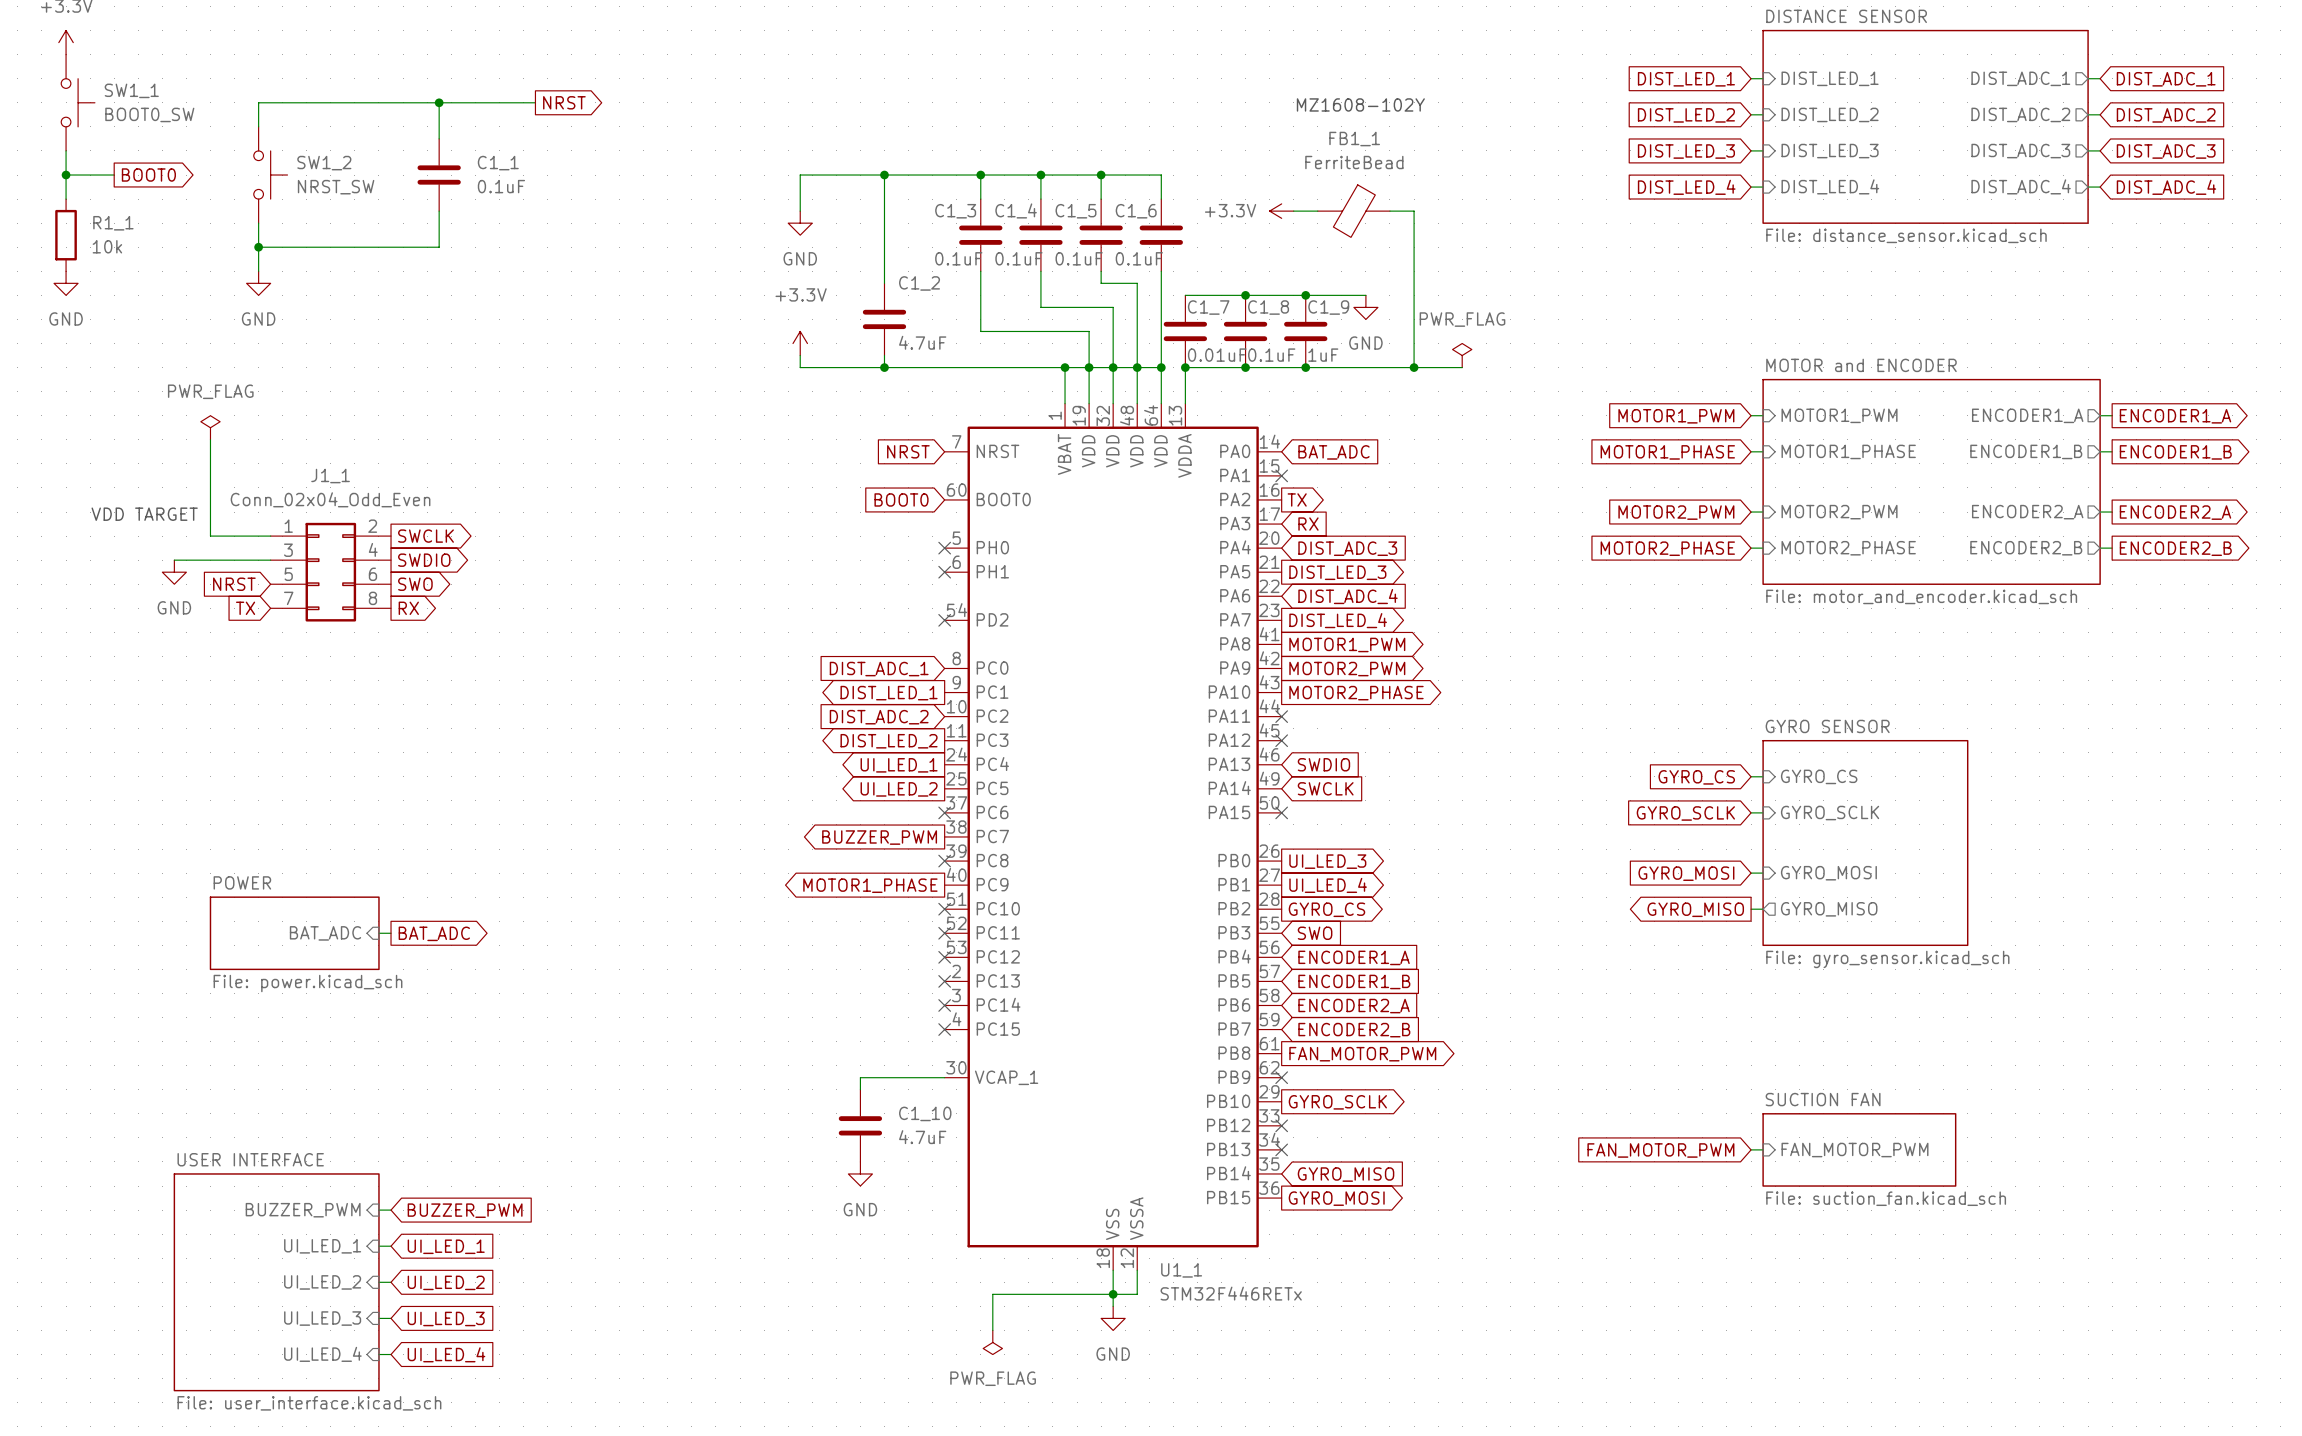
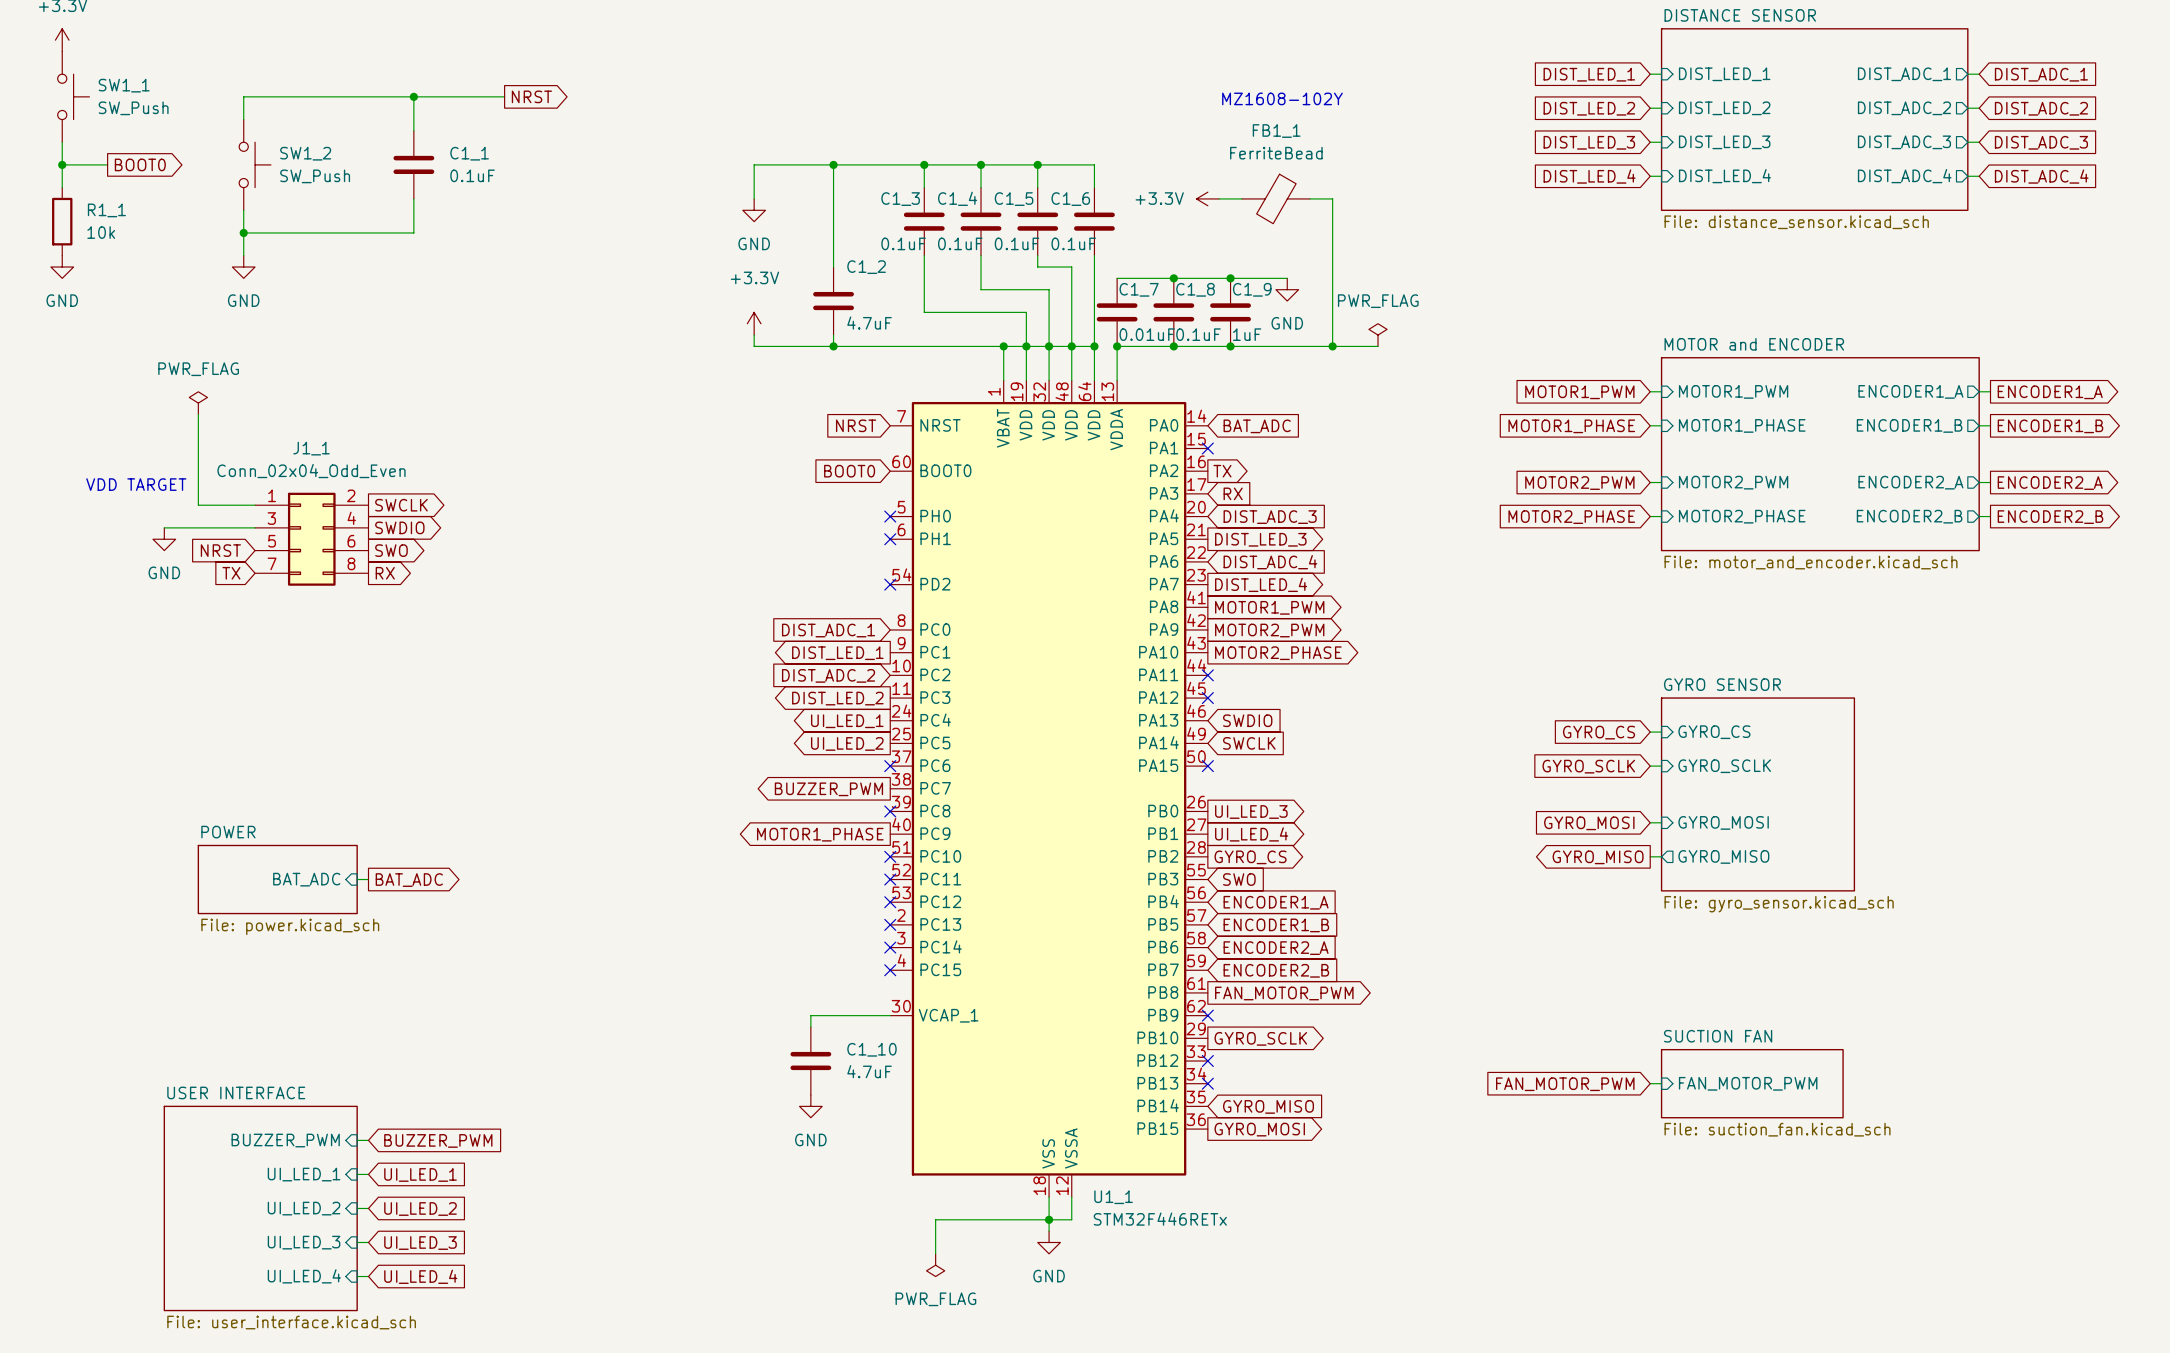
SW1_1 value: BOOT0_SW (149, 114) -> SW_Push (133, 108)
SW1_2 value: NRST_SW (336, 187) -> SW_Push (315, 176)

